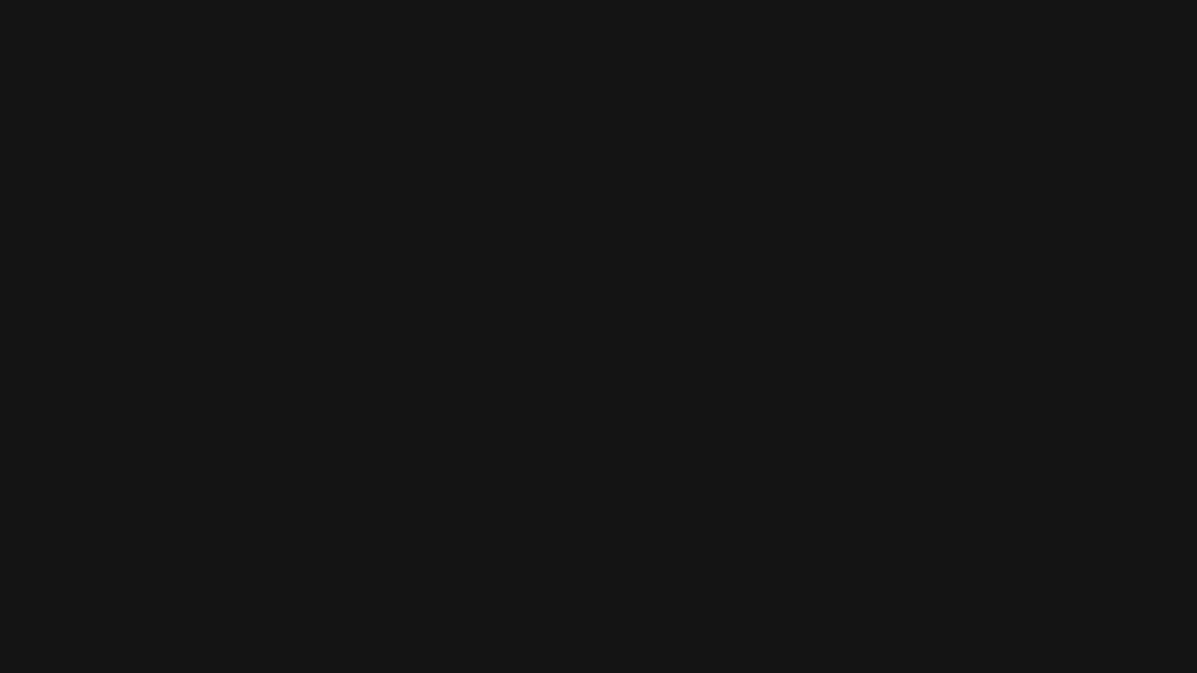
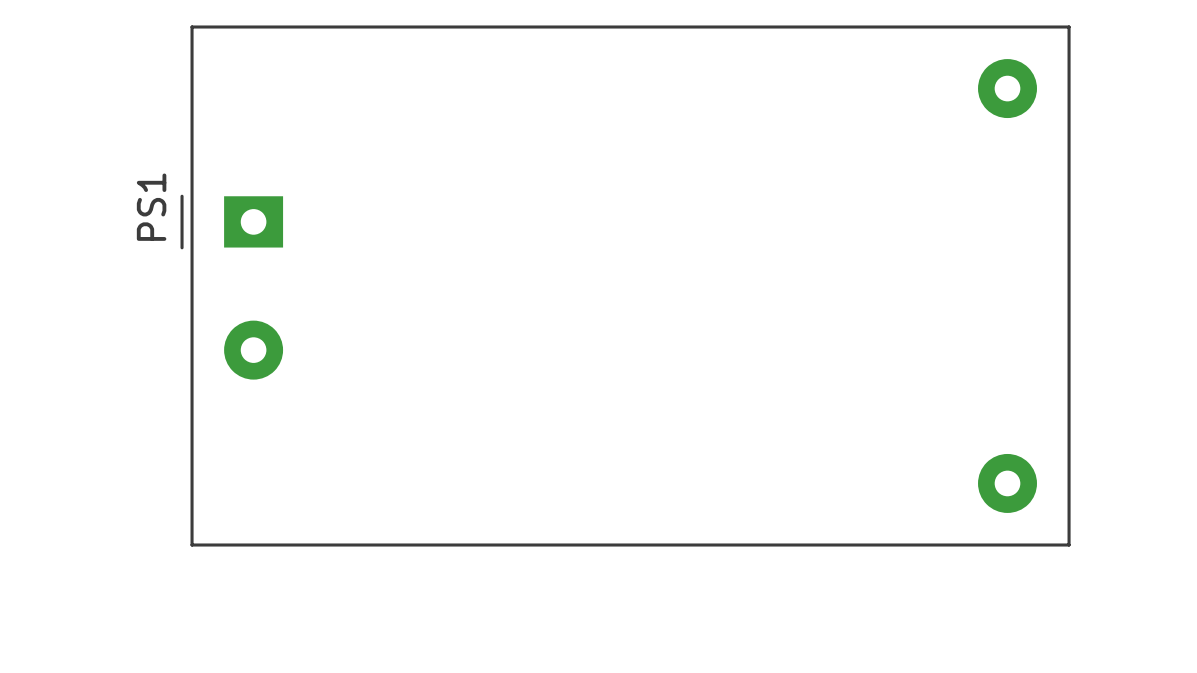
PS1: none -> (625, 286)

